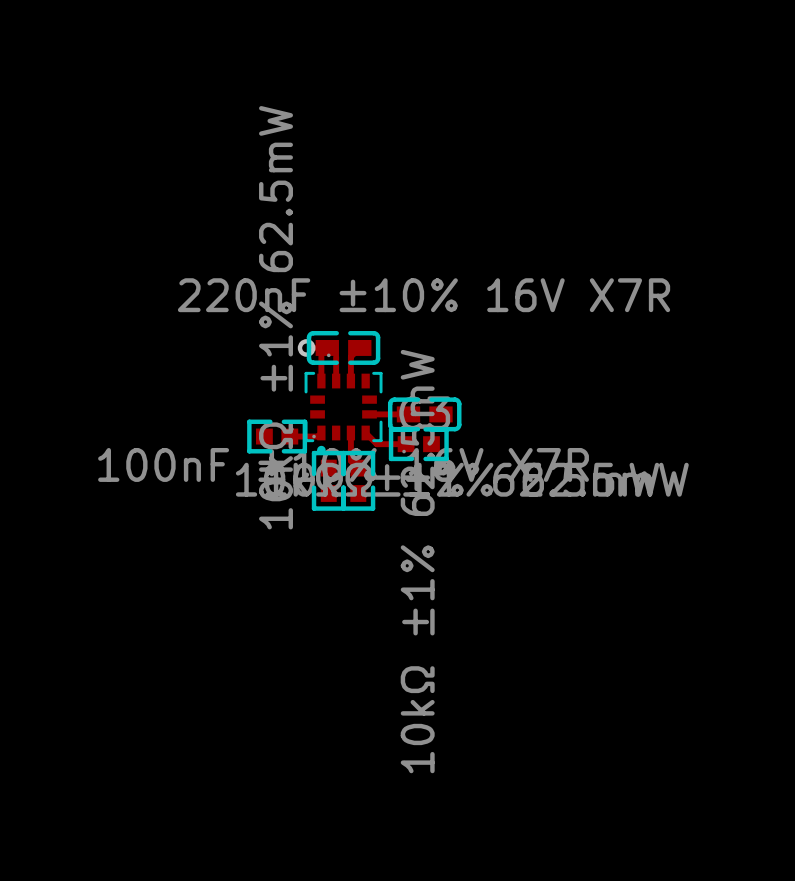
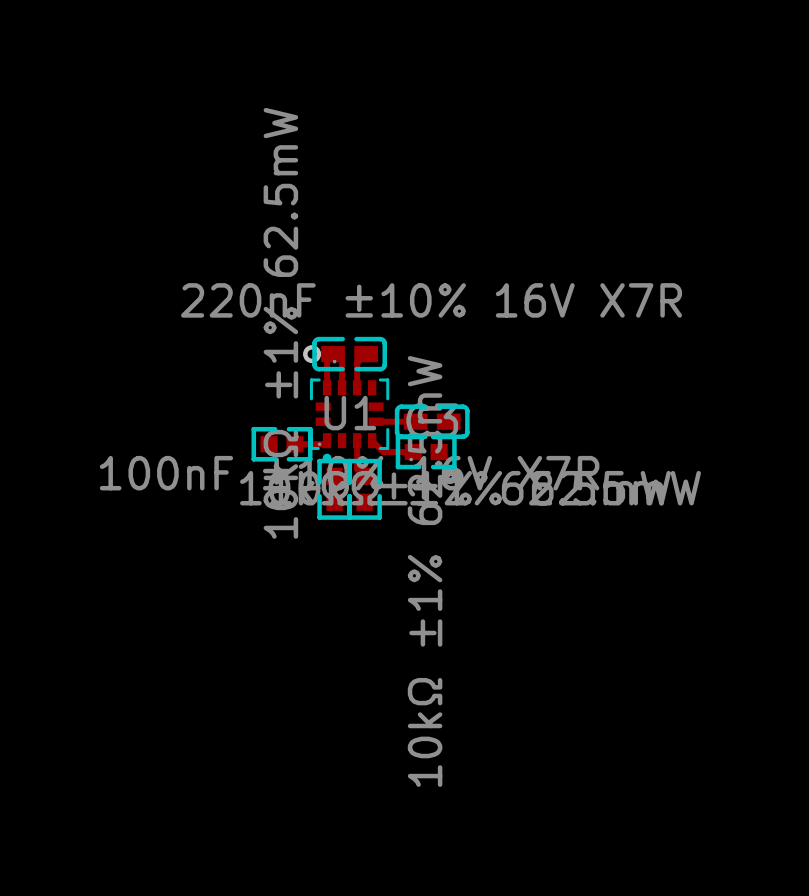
U1 name: none -> U1 (350, 413)

